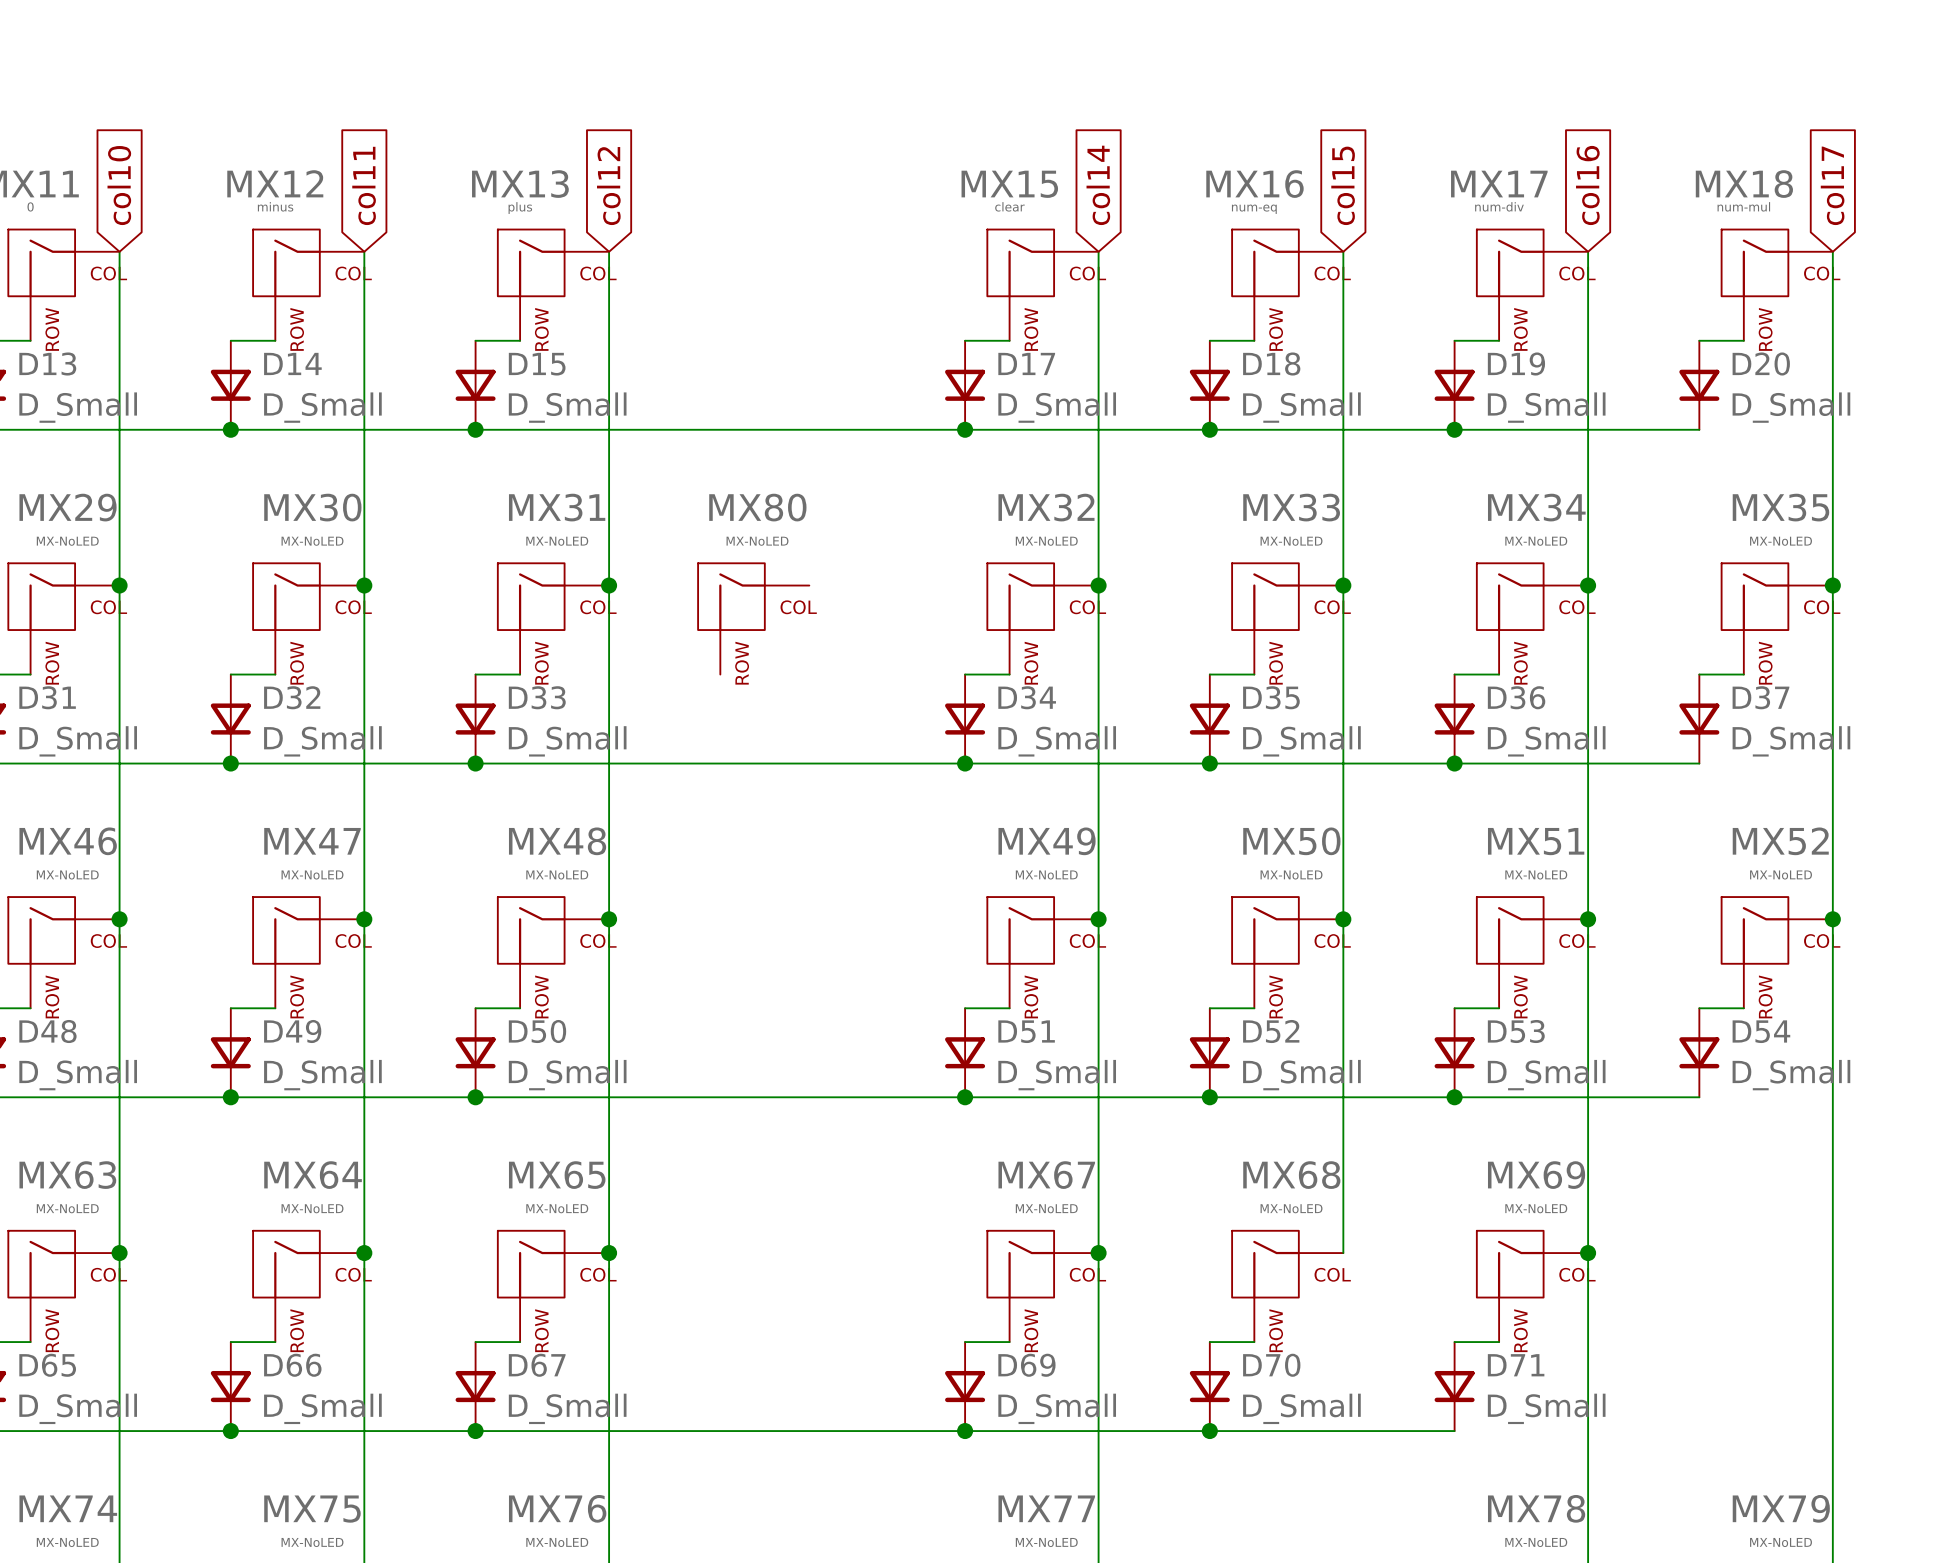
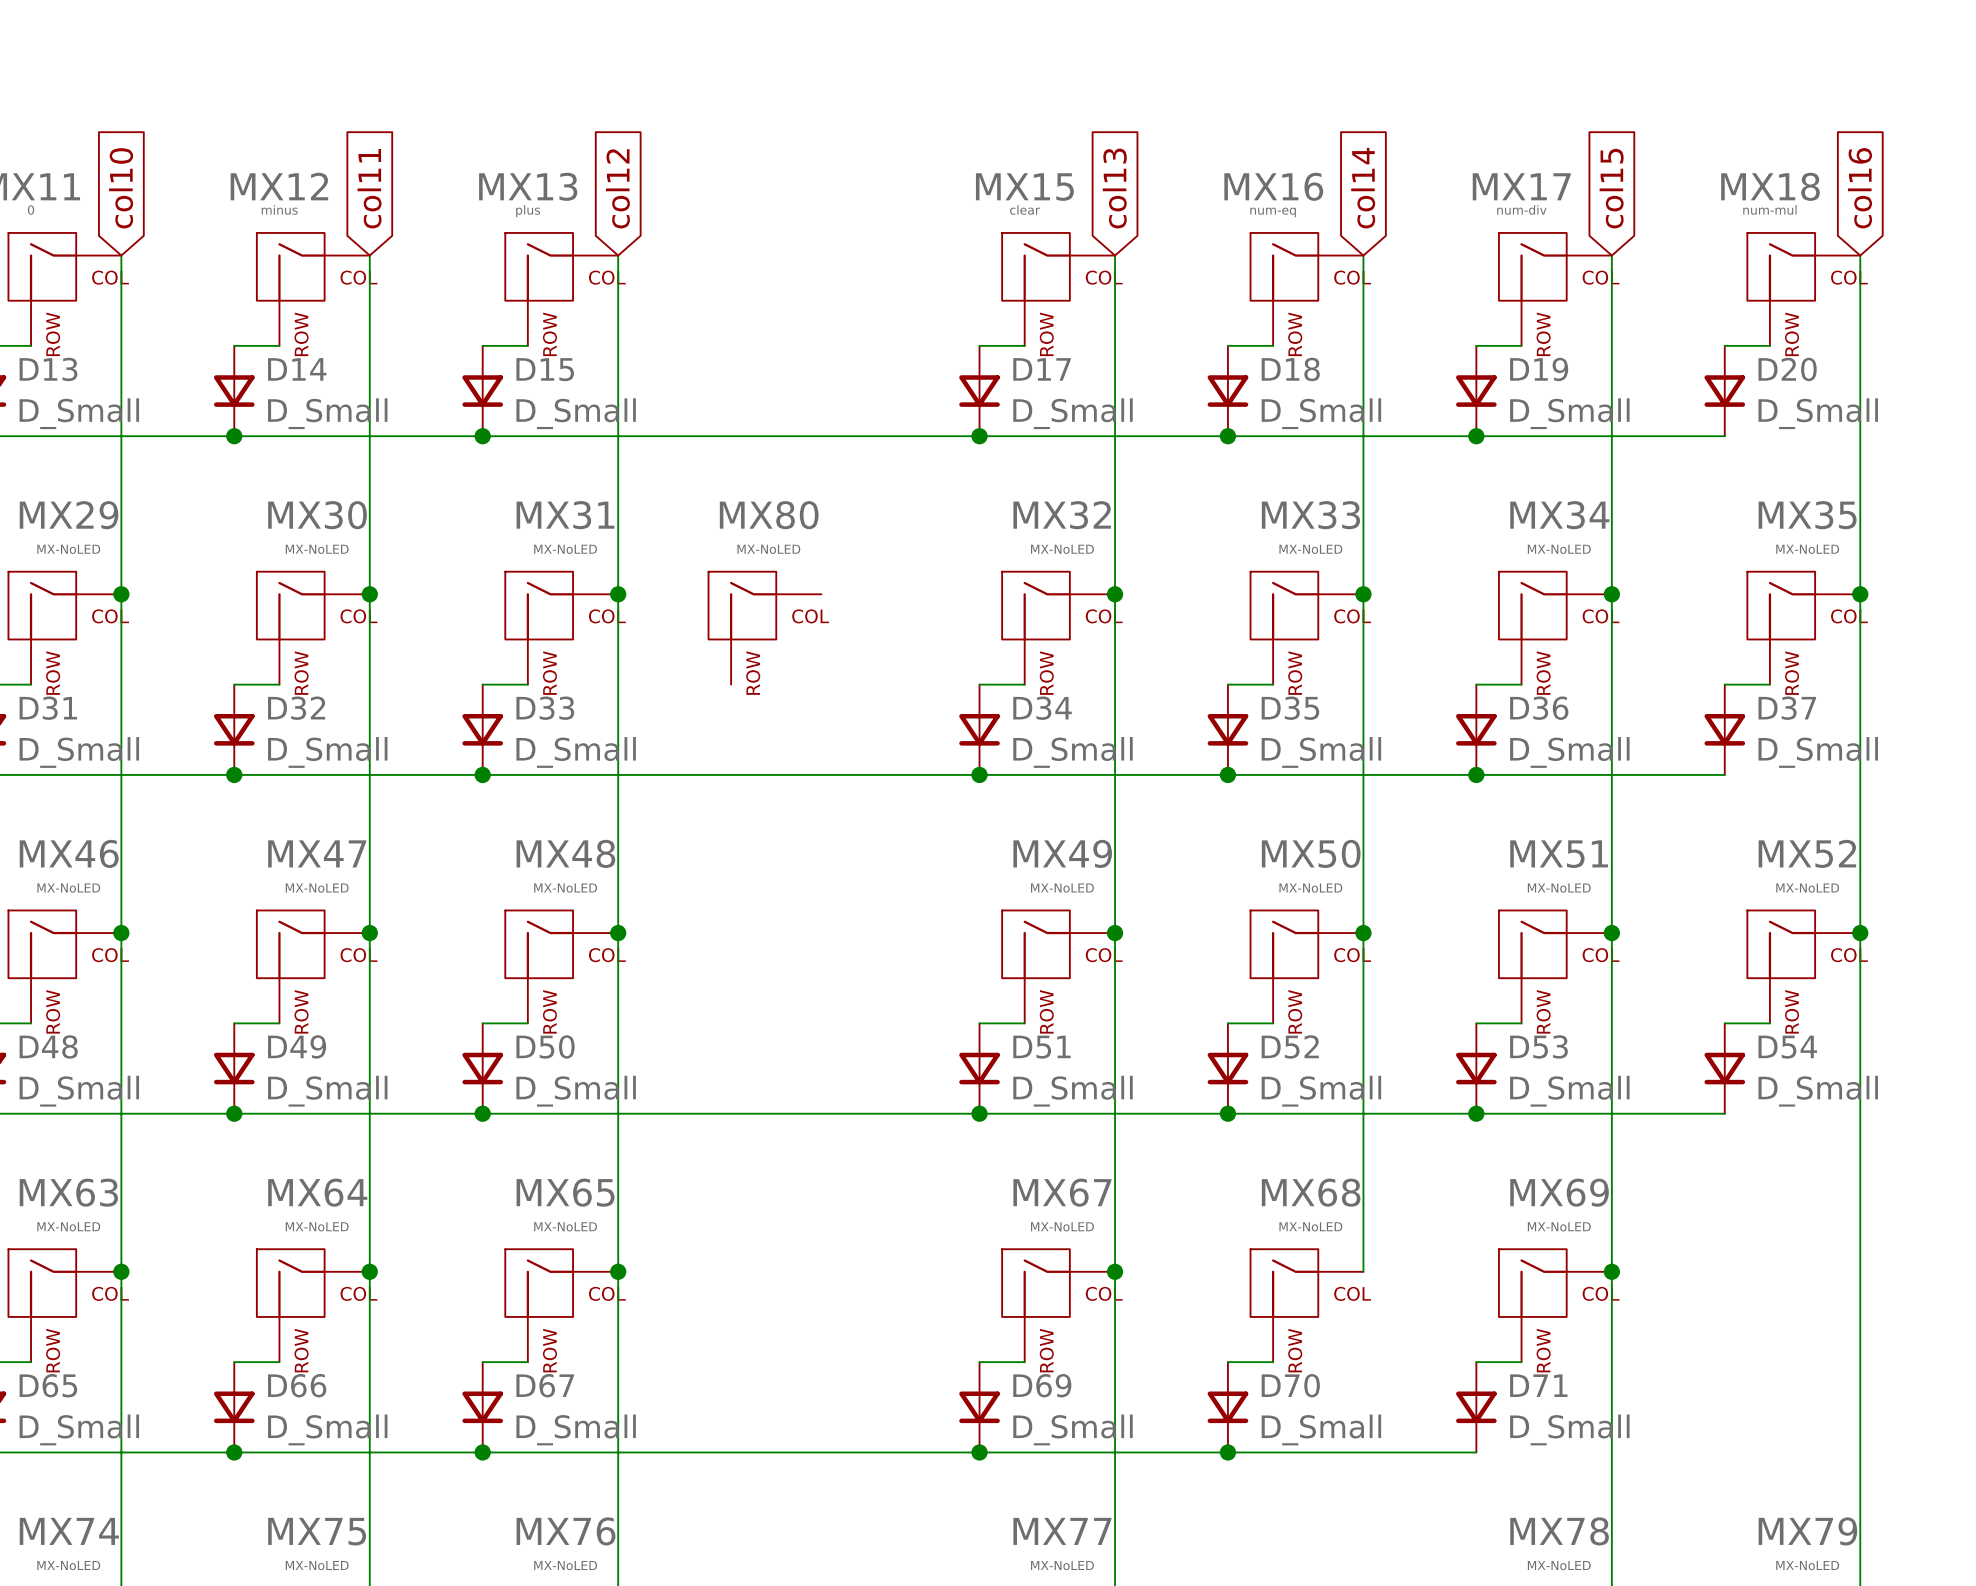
global label: col14 (1098, 185) -> col13 (1114, 188)
global label: col15 (1343, 185) -> col14 (1363, 188)
global label: col16 (1587, 185) -> col15 (1611, 188)
global label: col17 (1832, 185) -> col16 (1860, 188)

